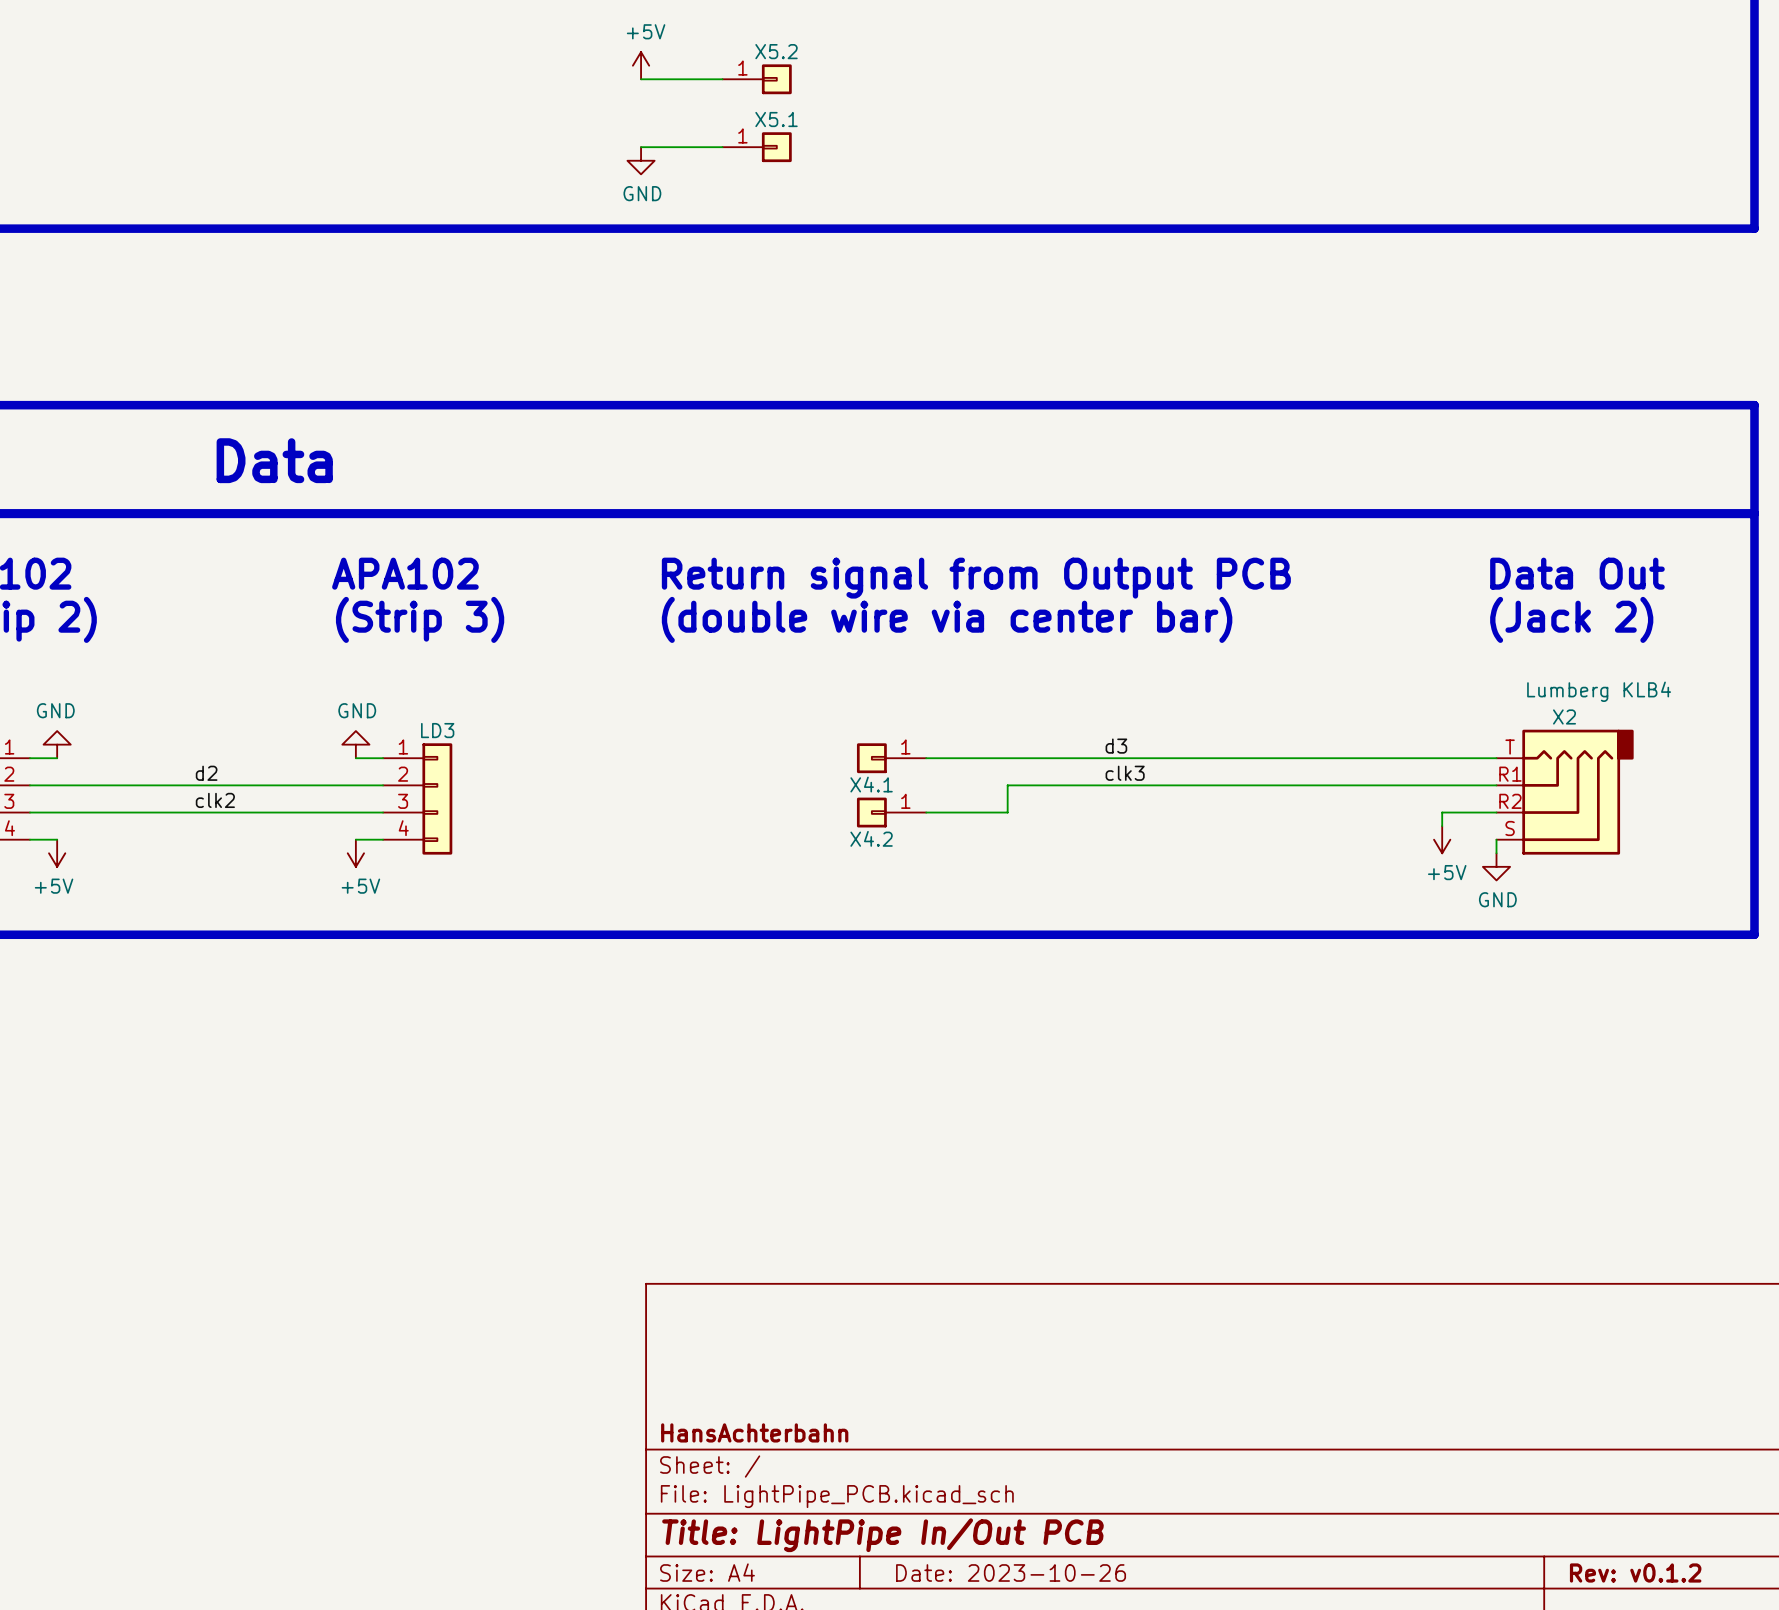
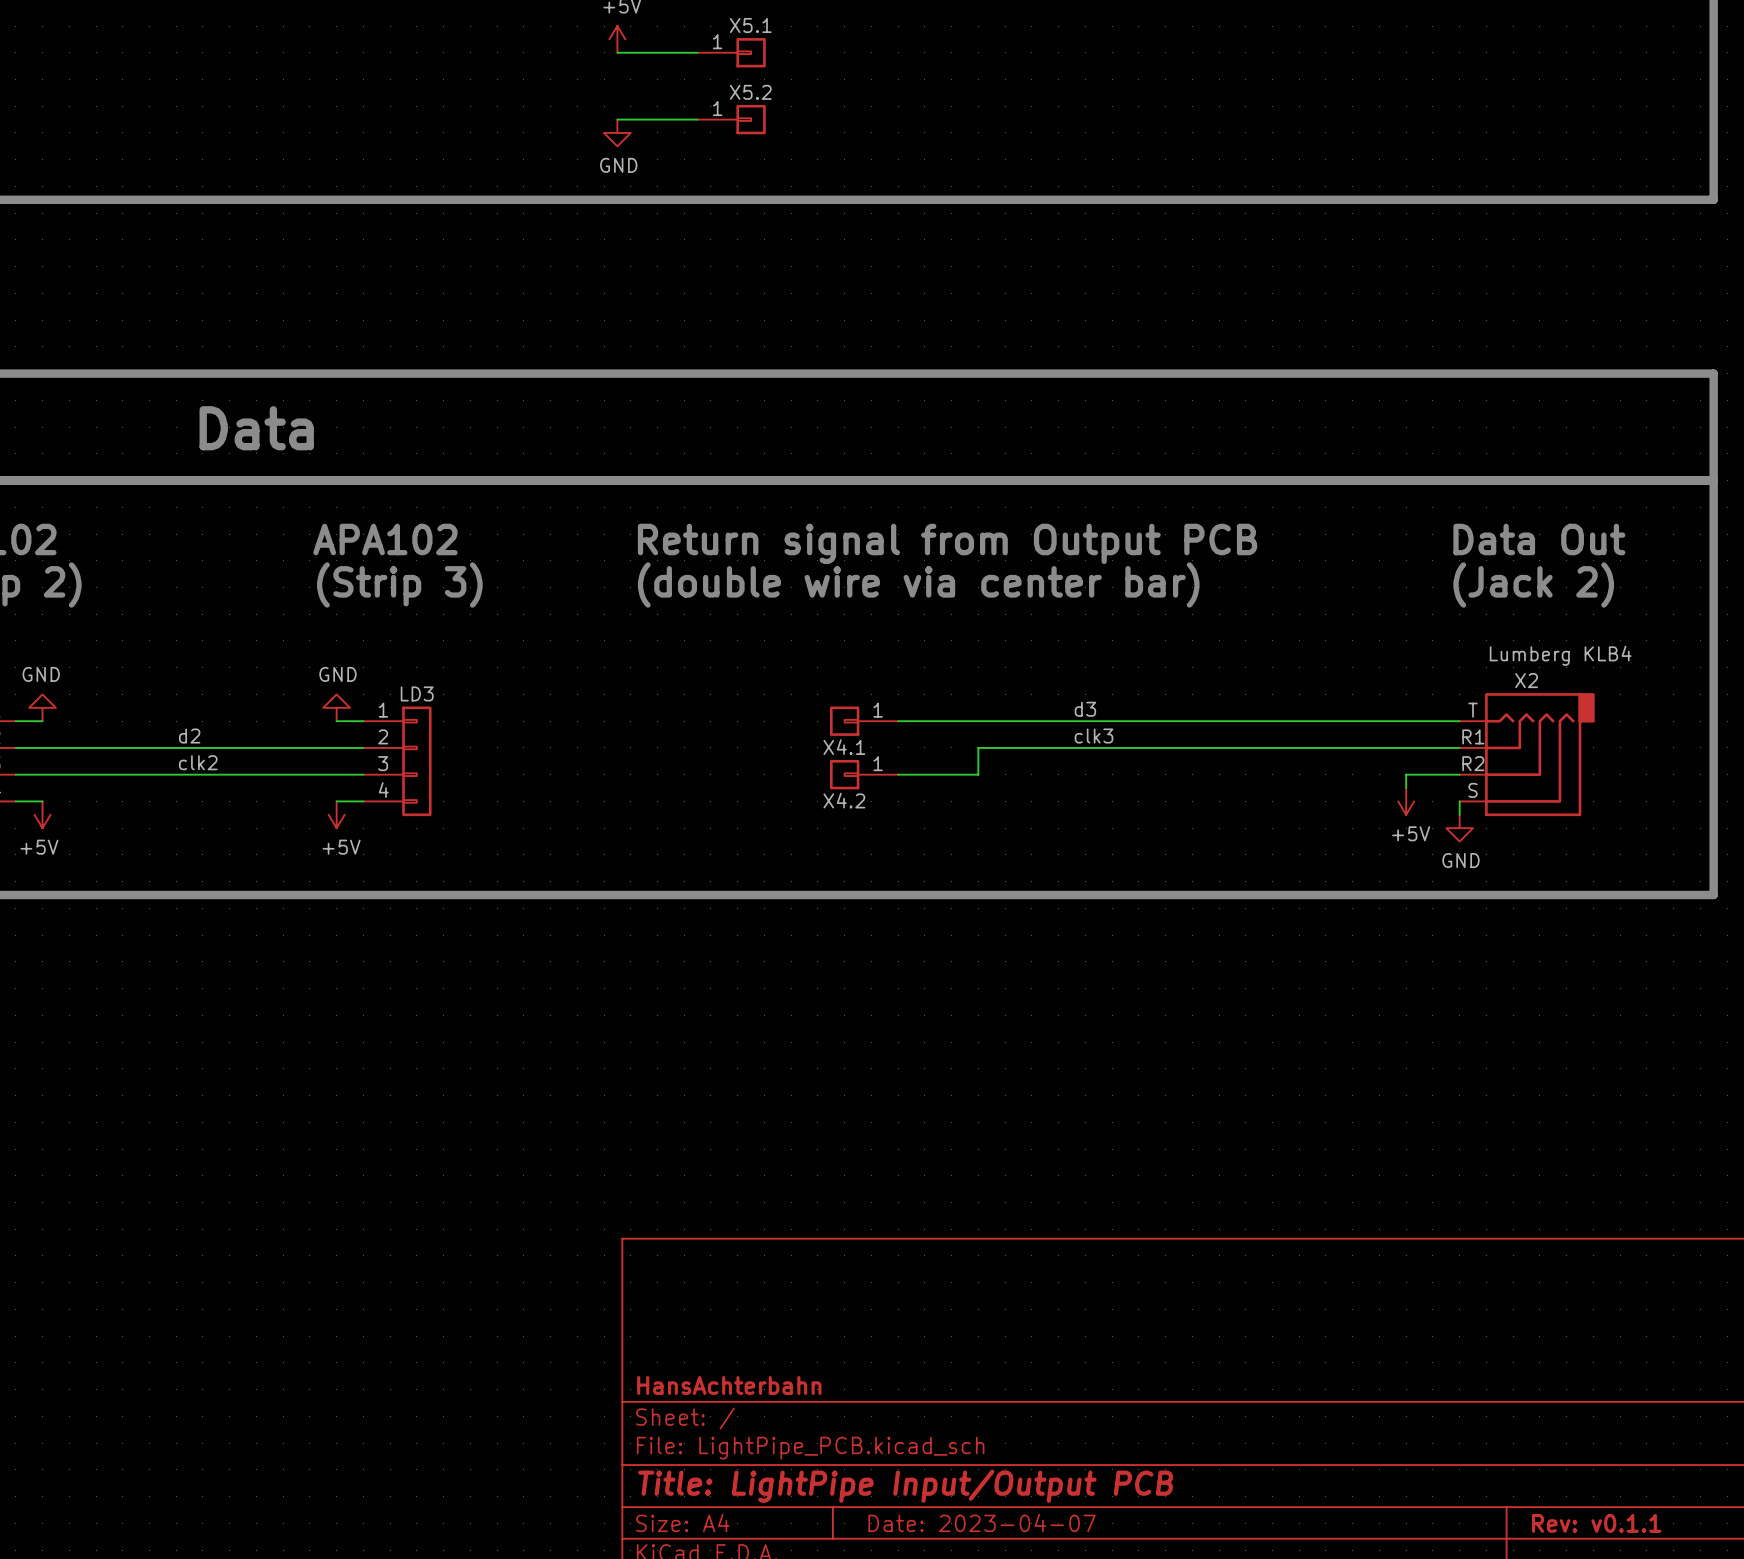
X5.2 name: X5.2 (776, 51) -> X5.1 (750, 25)
X5.1 name: X5.1 (776, 119) -> X5.2 (750, 92)
title block: Title: LightPipe In/Out PCB (882, 1535) -> Title: LightPipe Input/Output PCB (905, 1486)
title block: Date: 2023-10-26 (1011, 1572) -> Date: 2023-04-07 (982, 1523)
title block: Rev: v0.1.2 (1635, 1572) -> Rev: v0.1.1 (1596, 1523)

